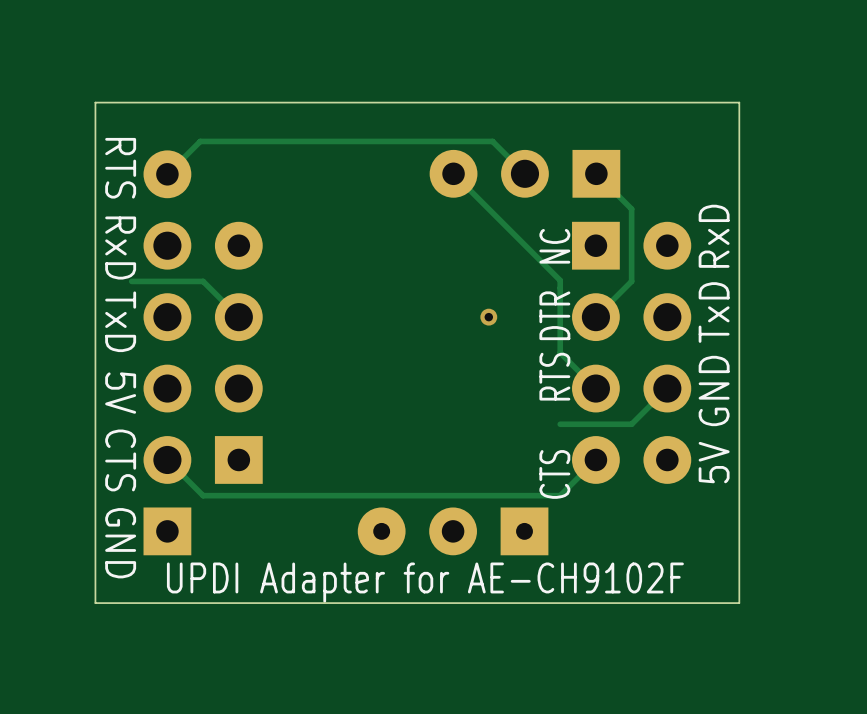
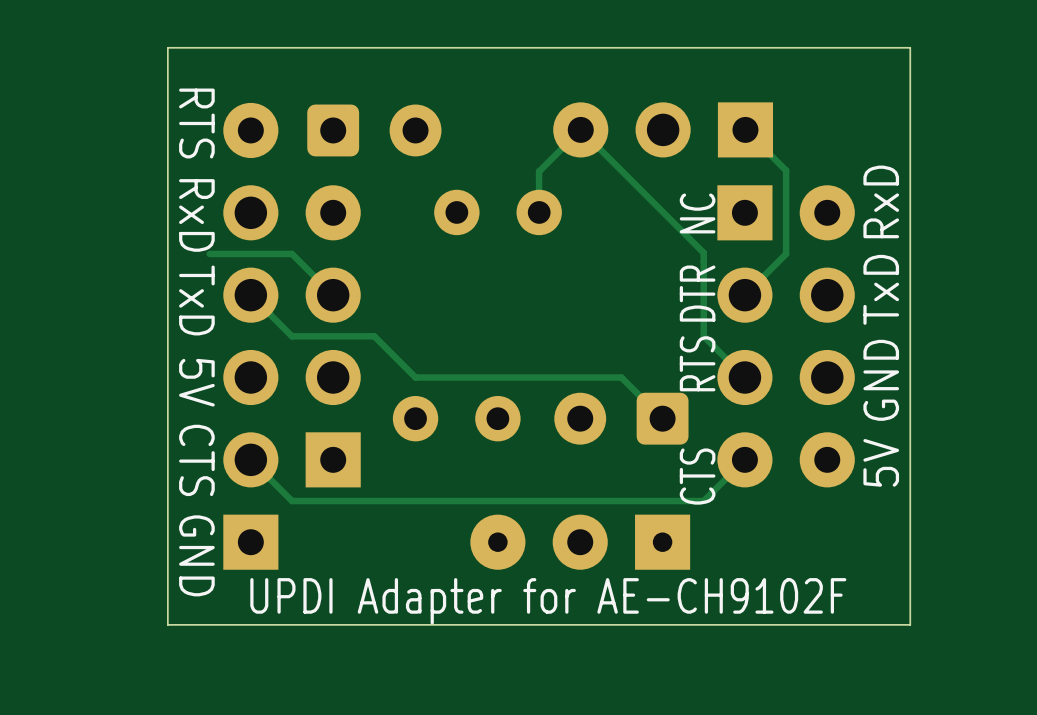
track: none -> (580, 129) (539, 171) (539, 212)
track: (524, 173) (492, 141) (200, 141) (167, 174) -> none
part: none -> (374, 130)
part: none -> (498, 212)
track: none -> (250, 295) (292, 336) (374, 336) (415, 377) (621, 377) (662, 418)
via: (488, 317) -> none
track: (667, 388) (631, 424) (560, 424) -> none
part: none -> (456, 418)
part: none -> (621, 418)

